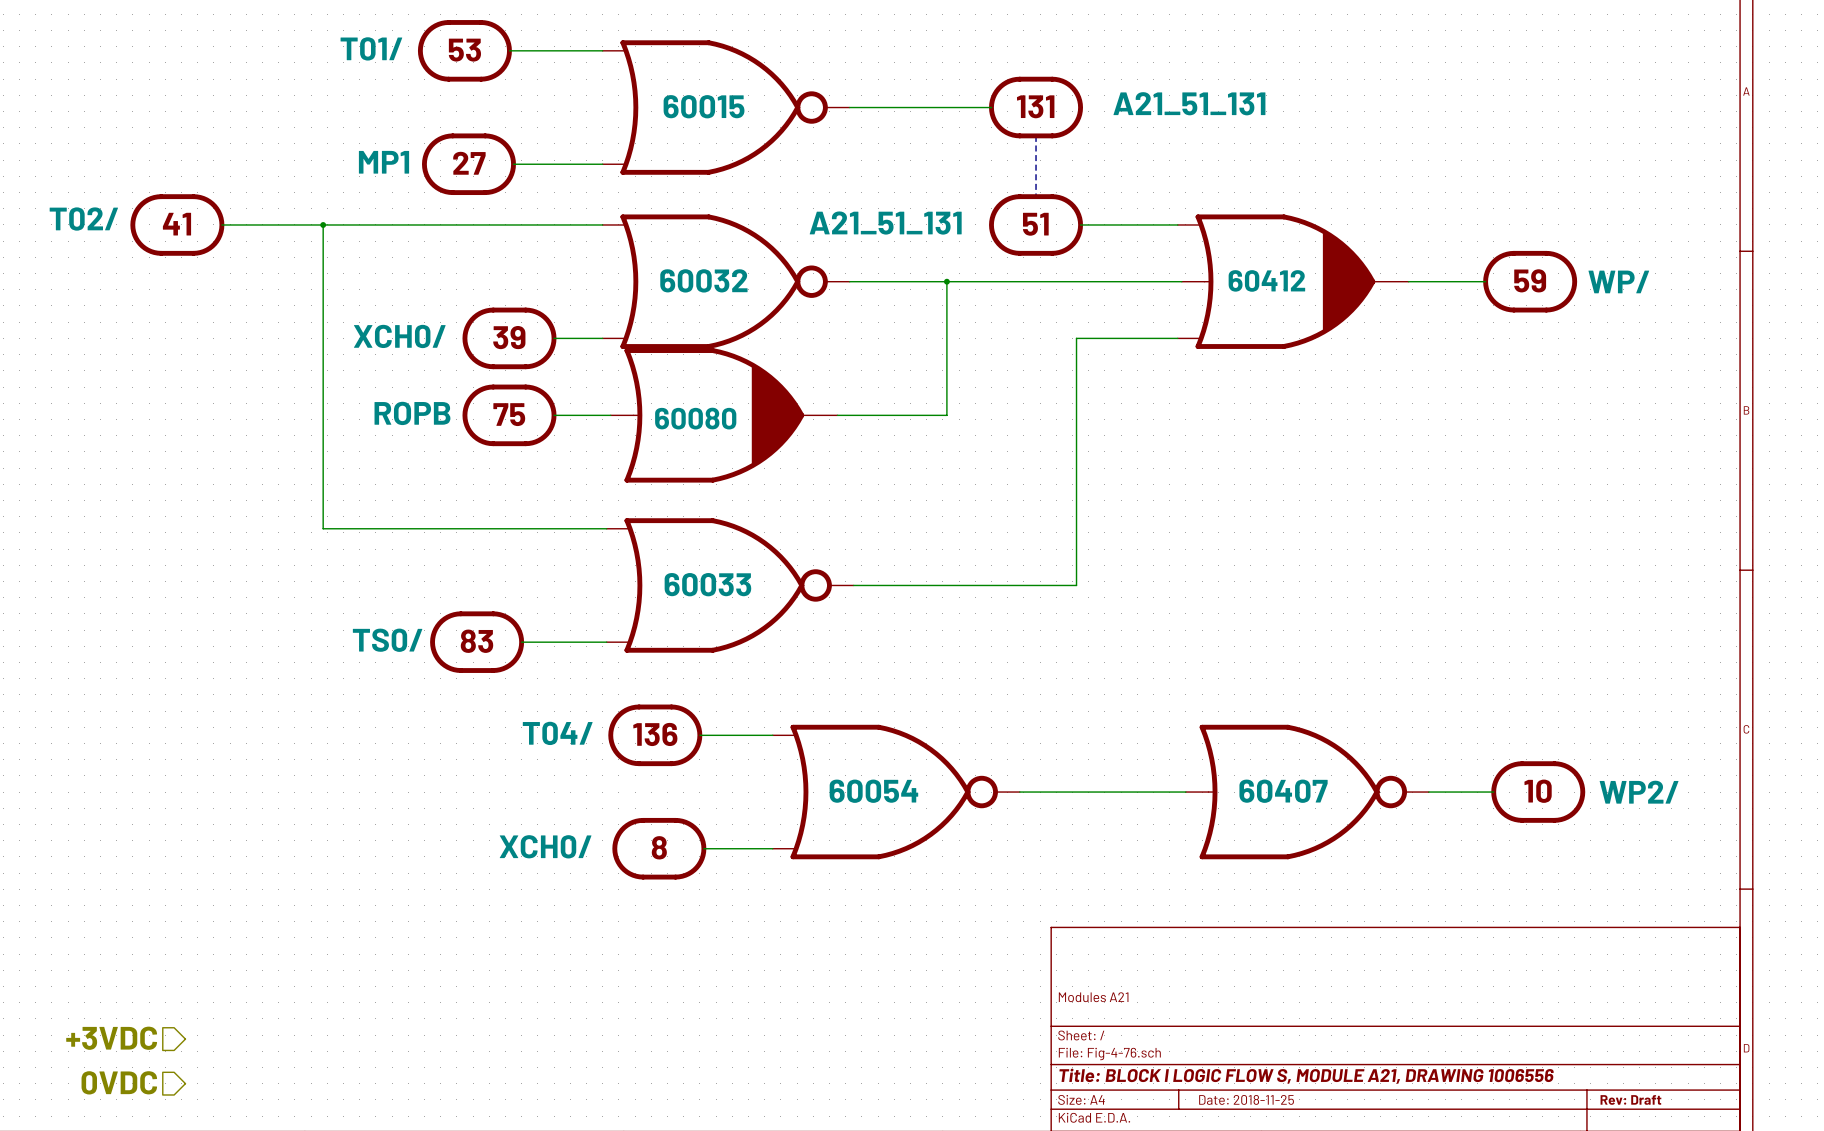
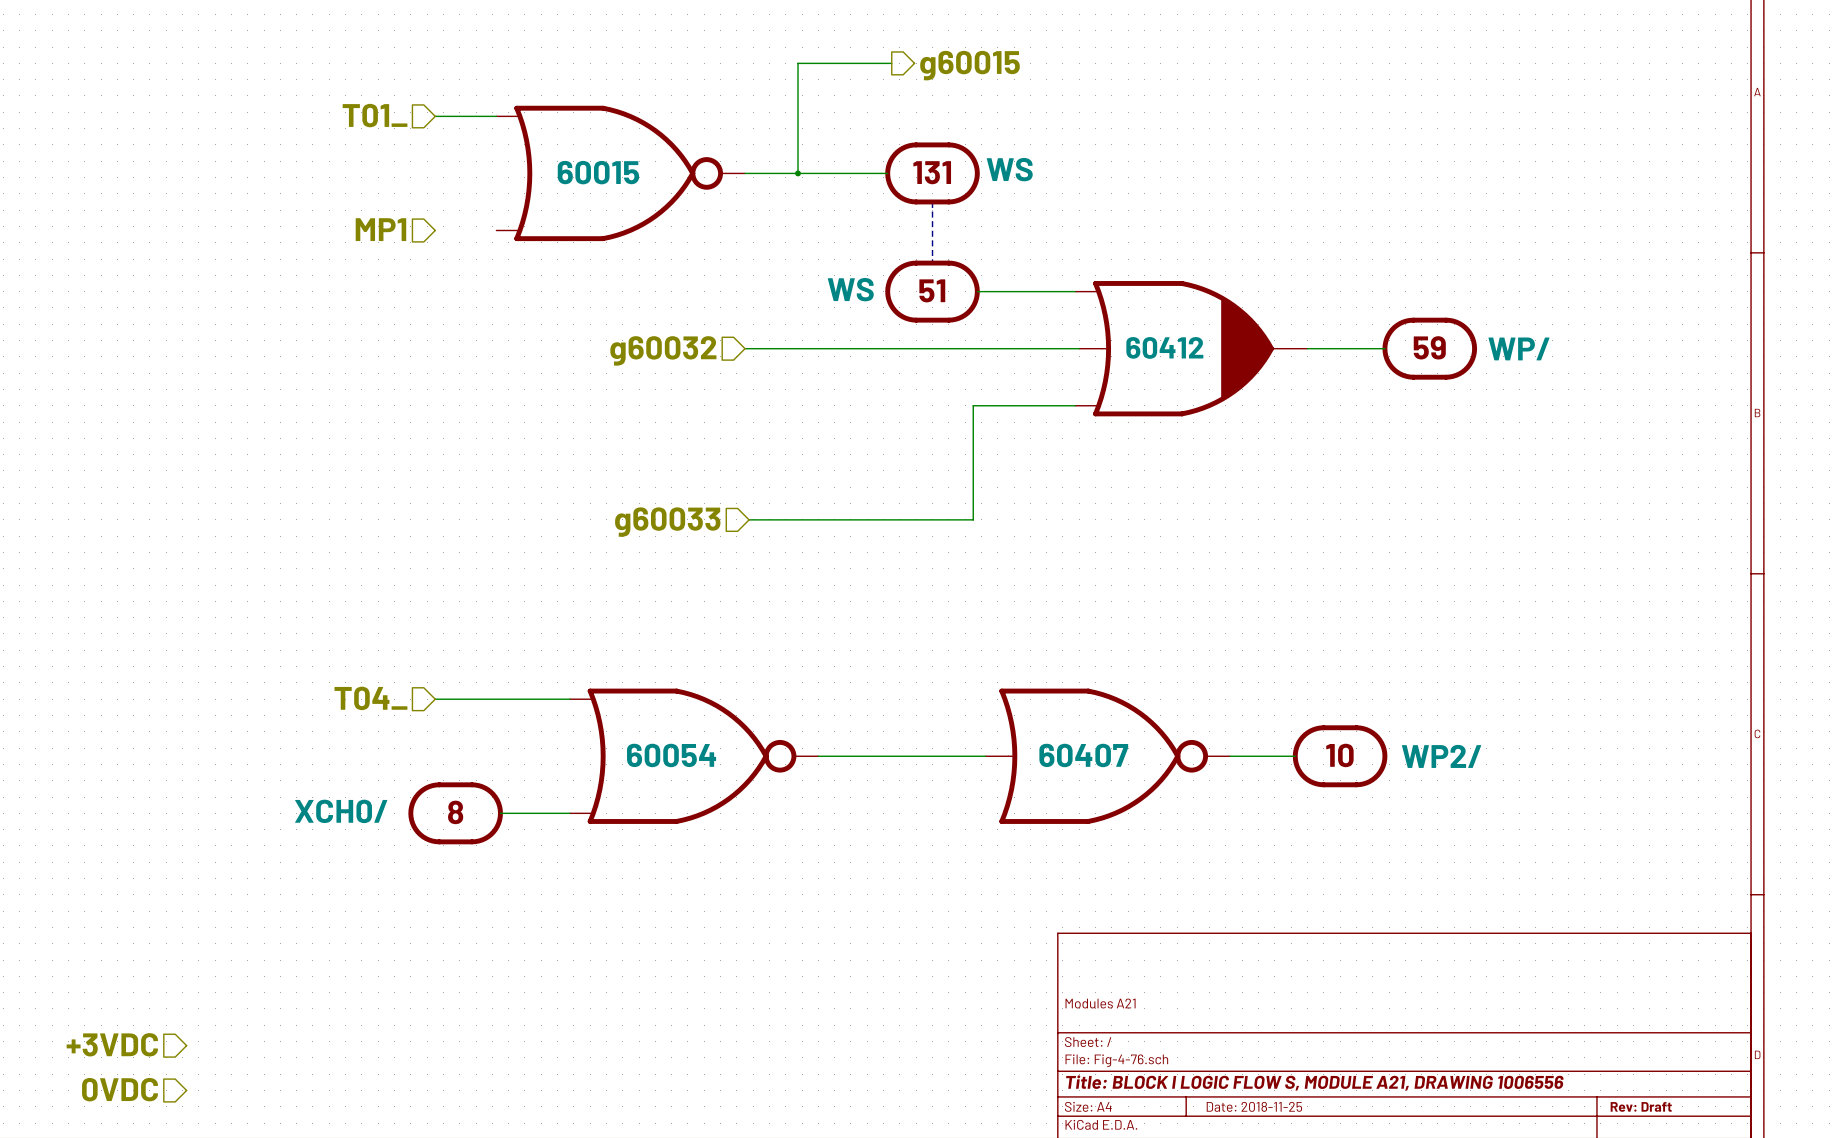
part: (464, 50) -> none
wire: (509, 50) (602, 50) -> none
wire: none -> (891, 63) (798, 63) (798, 173)
hierarchical label: none -> g60015 (970, 65)
part position: (726, 107) -> (620, 173)
wire: (849, 107) (991, 107) -> (745, 173) (887, 173)
part: (1036, 107) -> none
hierarchical label: none -> T01_ (375, 115)
wire: none -> (435, 116) (496, 116)
line: (1036, 135) (1036, 196) -> (932, 201) (932, 263)
part: (468, 164) -> none
wire: (513, 164) (602, 164) -> none
junction: none -> (798, 173)
part: none -> (932, 173)
part: (177, 224) -> none
wire: (221, 224) (602, 224) -> none
wire: (323, 224) (323, 528) (606, 528) -> none
junction: (323, 224) -> none
part: (1036, 224) -> none
wire: (1080, 224) (1177, 224) -> (977, 291) (1075, 291)
hierarchical label: none -> MP1 (380, 229)
part: (726, 281) -> none
wire: (849, 281) (1181, 281) -> (745, 348) (1079, 348)
wire: (946, 281) (946, 415) (837, 415) -> none
junction: (946, 281) -> none
part position: (1293, 281) -> (1191, 348)
wire: (1408, 281) (1485, 281) -> (1307, 348) (1384, 348)
part position: (1530, 281) -> (1429, 348)
part: none -> (932, 291)
part: (509, 338) -> none
wire: (554, 338) (602, 338) -> none
wire: (1177, 338) (1076, 338) (1076, 585) (853, 585) -> none
hierarchical label: none -> g60032 (663, 350)
wire: none -> (1075, 405) (973, 405) (973, 519) (749, 519)
part: (509, 415) -> none
wire: (554, 415) (610, 415) -> none
part: (724, 415) -> none
hierarchical label: none -> g60033 (667, 522)
part: (730, 585) -> none
part: (477, 642) -> none
wire: (521, 642) (606, 642) -> none
hierarchical label: none -> T04_ (370, 698)
wire: none -> (435, 699) (569, 699)
part: (655, 735) -> none
wire: (699, 735) (772, 735) -> none
part: none -> (694, 756)
wire: none -> (818, 756) (985, 756)
part: none -> (1107, 756)
wire: none -> (1230, 756) (1295, 756)
part: none -> (1340, 756)
part: (896, 792) -> none
wire: (1019, 792) (1185, 792) -> none
part: (1307, 792) -> none
wire: (1428, 792) (1493, 792) -> none
part: (1538, 792) -> none
part: none -> (455, 813)
wire: none -> (500, 813) (569, 813)
part: (659, 848) -> none
wire: (703, 848) (772, 848) -> none

